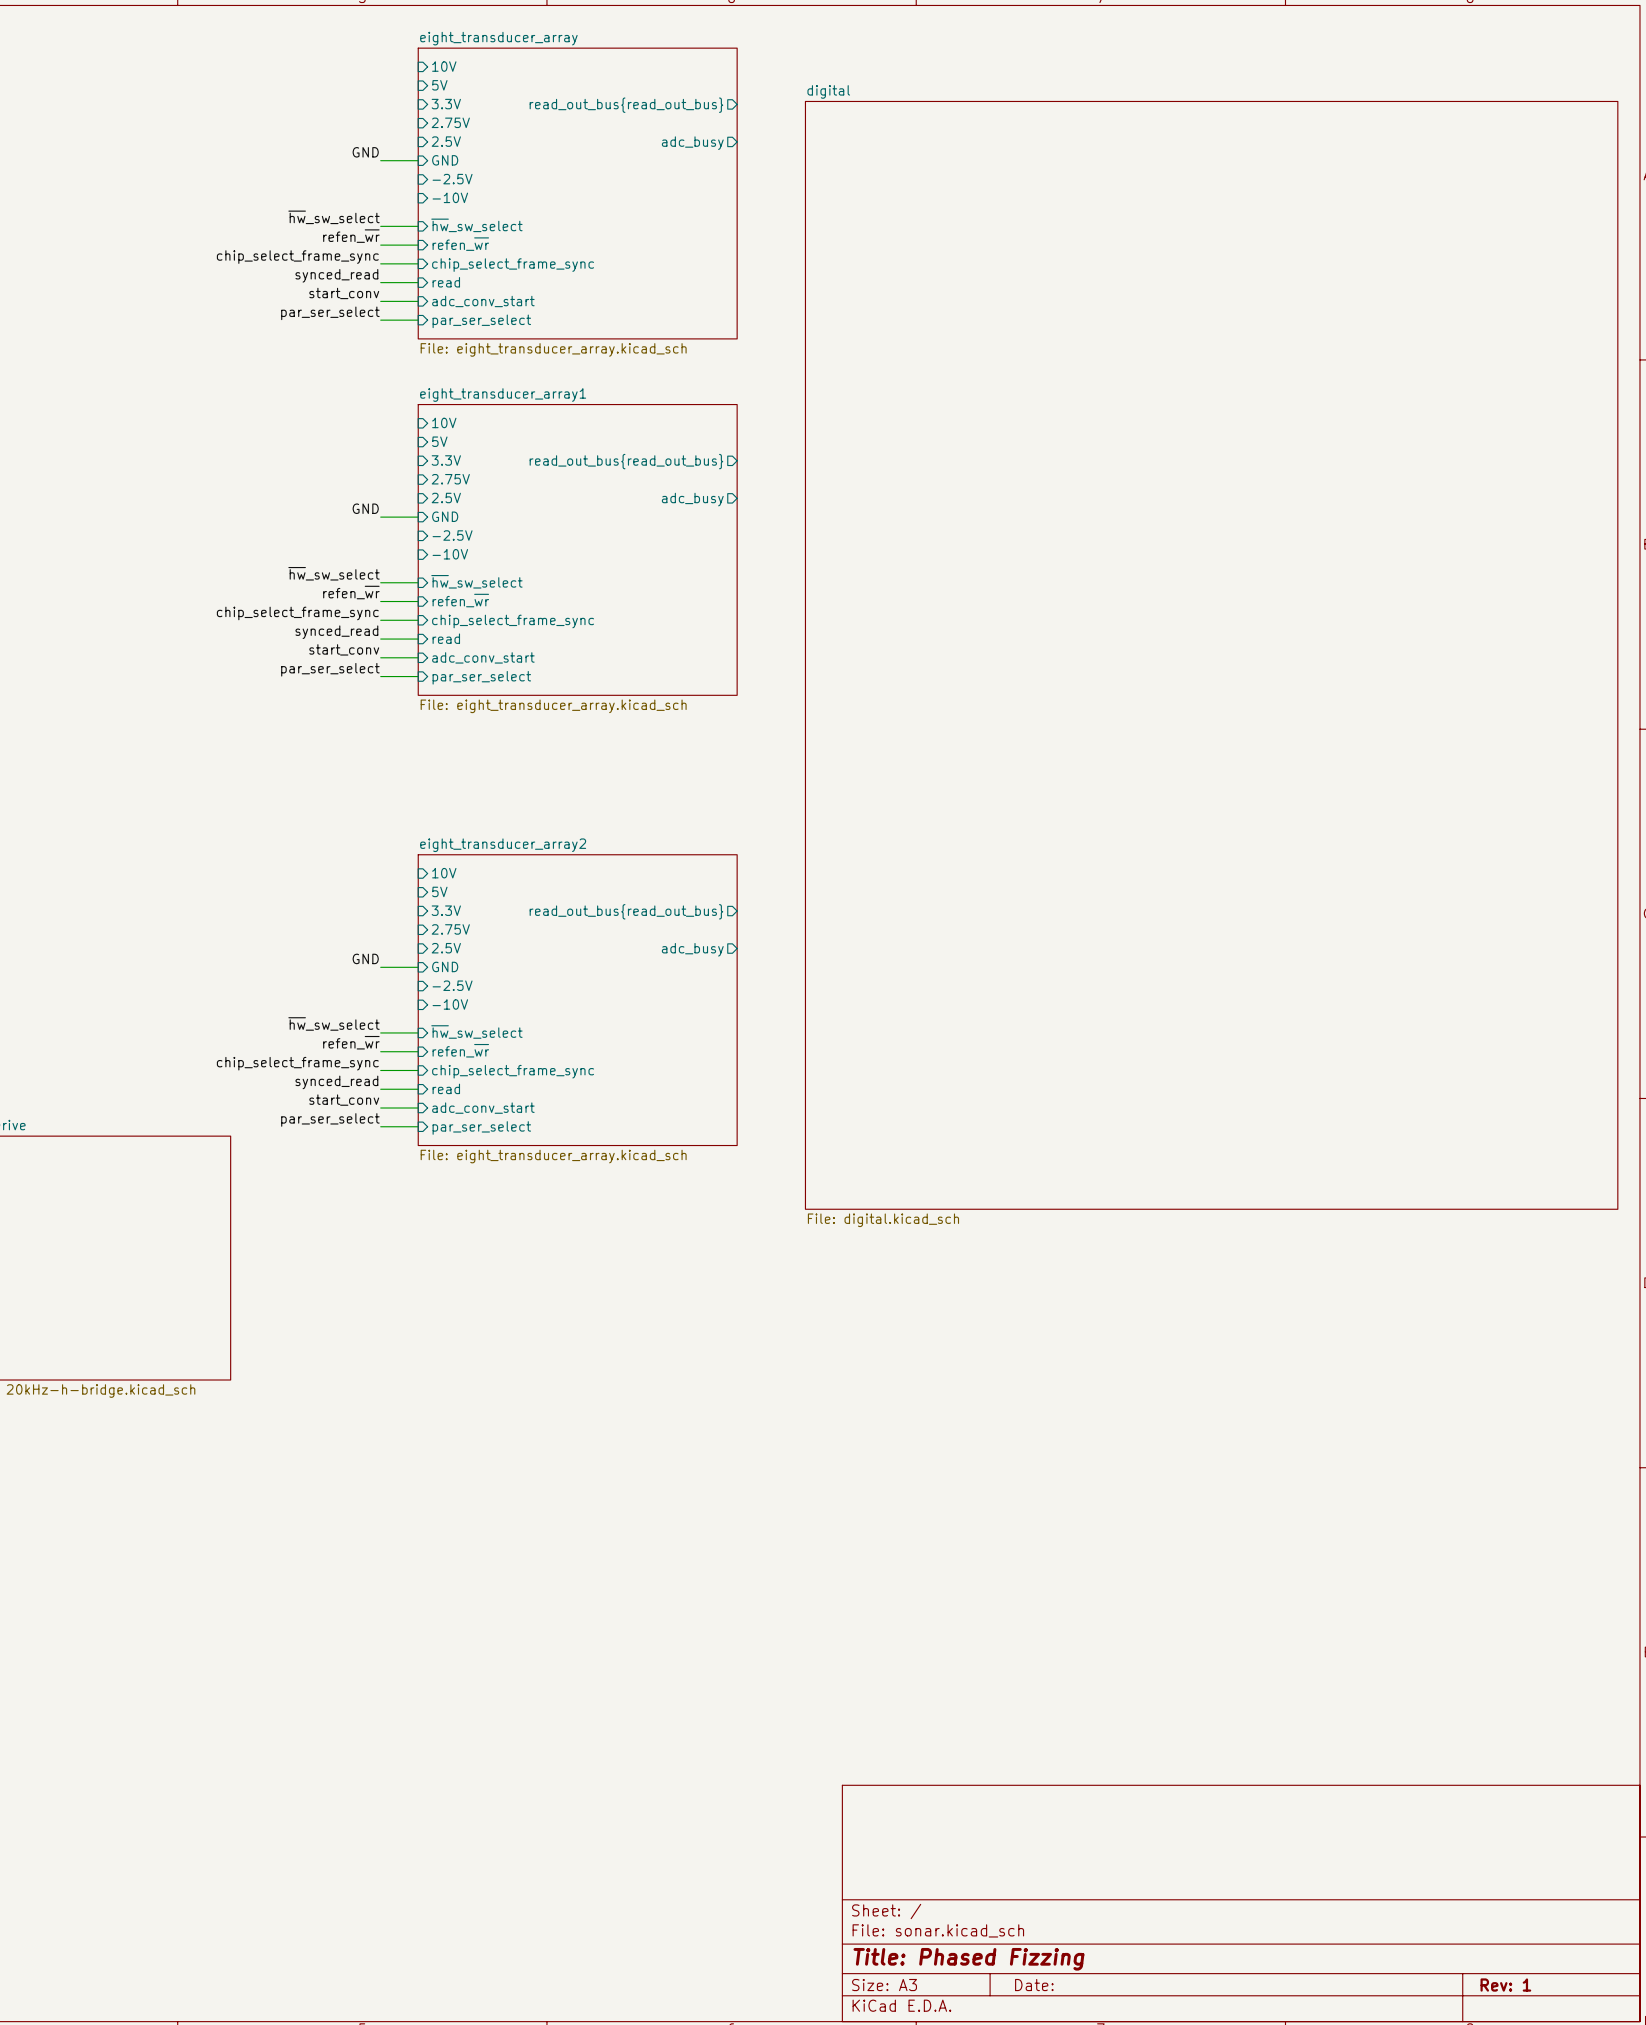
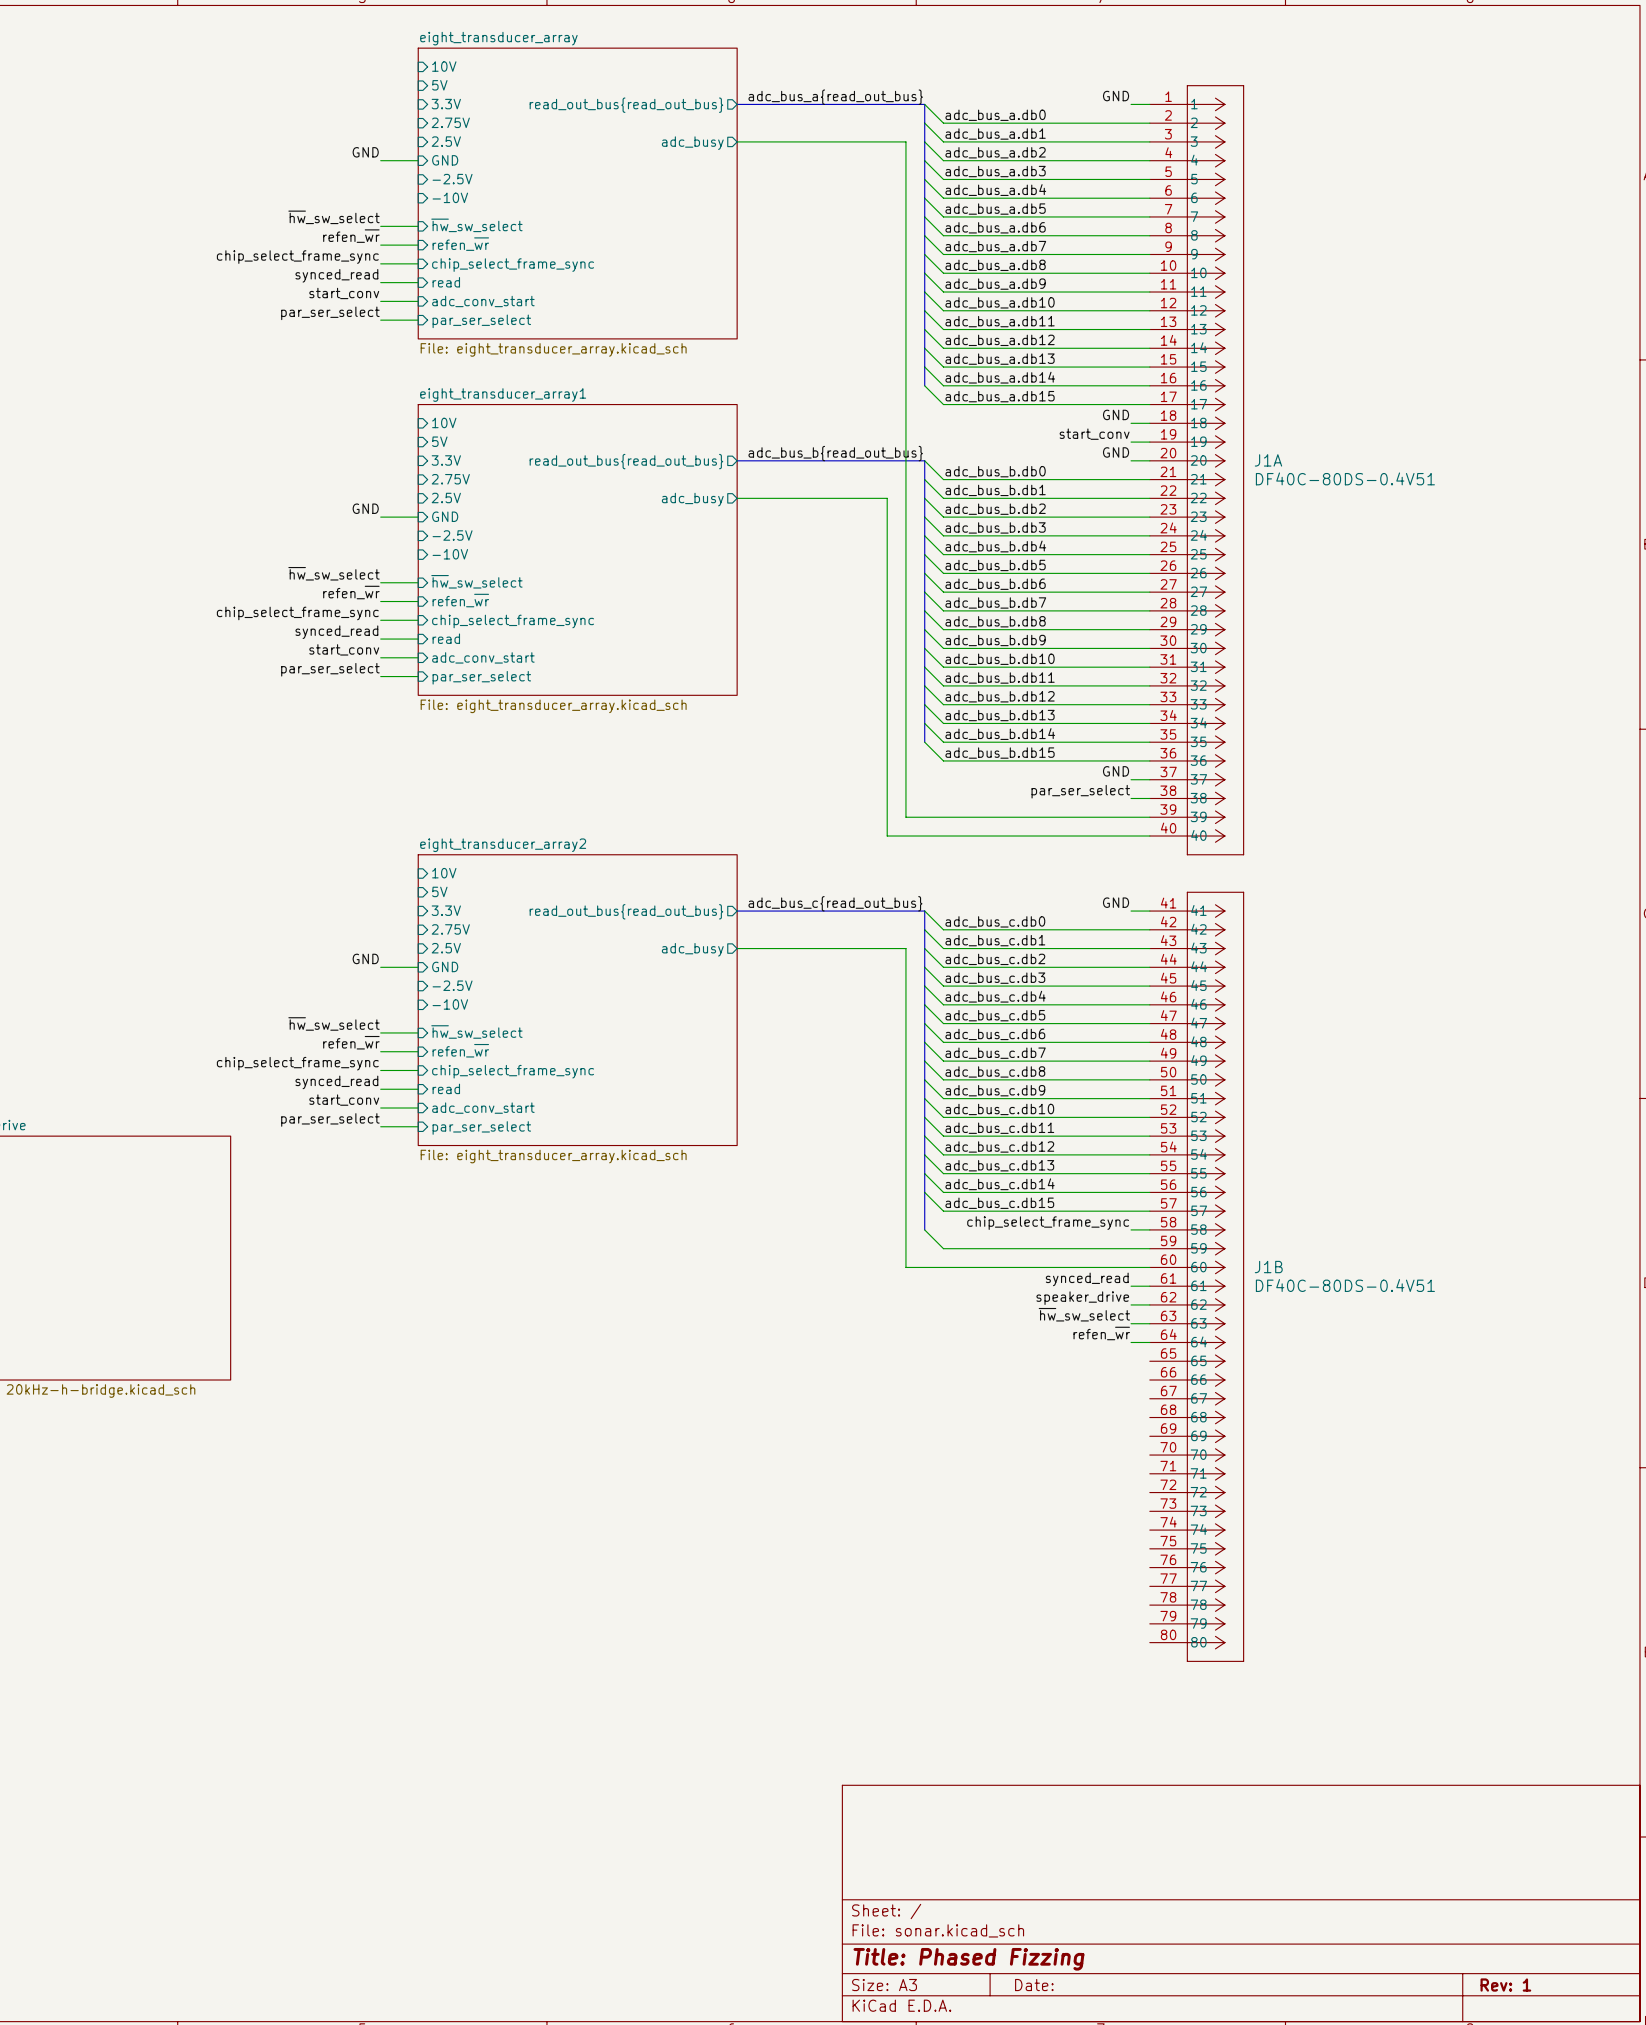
label: none -> GND (1116, 96)
label: none -> adc_bus_a{read_out_bus} (835, 97)
bus: none -> (737, 104) (924, 104) (924, 385)
wire: none -> (924, 104) (943, 123) (1149, 123)
wire: none -> (1131, 104) (1149, 104)
label: none -> adc_bus_a.db0 (995, 115)
wire: none -> (924, 123) (943, 141) (1149, 141)
label: none -> adc_bus_a.db1 (995, 134)
wire: none -> (737, 141) (905, 141) (905, 817) (1149, 817)
wire: none -> (924, 141) (943, 160) (1149, 160)
label: none -> adc_bus_a.db2 (995, 152)
wire: none -> (924, 160) (943, 179) (1149, 179)
label: none -> adc_bus_a.db3 (995, 171)
wire: none -> (924, 179) (943, 198) (1149, 198)
label: none -> adc_bus_a.db4 (995, 190)
wire: none -> (924, 198) (943, 216) (1149, 216)
label: none -> adc_bus_a.db5 (995, 209)
wire: none -> (924, 216) (943, 235) (1149, 235)
label: none -> adc_bus_a.db6 (995, 227)
wire: none -> (924, 235) (943, 254) (1149, 254)
label: none -> adc_bus_a.db7 (995, 246)
wire: none -> (924, 254) (943, 273) (1149, 273)
label: none -> adc_bus_a.db8 (995, 265)
wire: none -> (924, 273) (943, 292) (1149, 292)
label: none -> adc_bus_a.db9 (995, 284)
wire: none -> (924, 292) (943, 310) (1149, 310)
label: none -> adc_bus_a.db10 (1000, 302)
wire: none -> (924, 310) (943, 329) (1149, 329)
label: none -> adc_bus_a.db11 (1000, 321)
wire: none -> (924, 329) (943, 348) (1149, 348)
label: none -> adc_bus_a.db12 (1000, 340)
wire: none -> (924, 348) (943, 367) (1149, 367)
label: none -> adc_bus_a.db13 (1000, 359)
wire: none -> (924, 367) (943, 385) (1149, 385)
label: none -> adc_bus_a.db14 (1000, 377)
wire: none -> (924, 385) (943, 404) (1149, 404)
label: none -> adc_bus_a.db15 (1000, 396)
label: none -> GND (1116, 414)
wire: none -> (1131, 423) (1149, 423)
label: none -> start_conv (1094, 434)
wire: none -> (1131, 442) (1149, 442)
label: none -> GND (1116, 452)
label: none -> adc_bus_b{read_out_bus} (835, 453)
bus: none -> (737, 460) (924, 460) (924, 742)
wire: none -> (924, 460) (943, 479) (1149, 479)
wire: none -> (1131, 460) (1149, 460)
J1A: none -> DF40C-80DS-0.4V51 (1196, 470)
label: none -> adc_bus_b.db0 (995, 471)
wire: none -> (924, 479) (943, 498) (1149, 498)
label: none -> adc_bus_b.db1 (995, 490)
wire: none -> (737, 498) (887, 498) (887, 836) (1149, 836)
wire: none -> (924, 498) (943, 517) (1149, 517)
label: none -> adc_bus_b.db2 (995, 509)
wire: none -> (924, 517) (943, 535) (1149, 535)
label: none -> adc_bus_b.db3 (995, 527)
wire: none -> (924, 535) (943, 554) (1149, 554)
label: none -> adc_bus_b.db4 (995, 546)
wire: none -> (924, 554) (943, 573) (1149, 573)
label: none -> adc_bus_b.db5 (995, 565)
wire: none -> (924, 573) (943, 592) (1149, 592)
label: none -> adc_bus_b.db6 (995, 584)
wire: none -> (924, 592) (943, 610) (1149, 610)
label: none -> adc_bus_b.db7 (995, 602)
wire: none -> (924, 610) (943, 629) (1149, 629)
label: none -> adc_bus_b.db8 (995, 621)
wire: none -> (924, 629) (943, 648) (1149, 648)
label: none -> adc_bus_b.db9 (995, 640)
wire: none -> (924, 648) (943, 667) (1149, 667)
sheet digital: File: digital.kicad_sch (1211, 655) -> none
label: none -> adc_bus_b.db10 (1000, 659)
wire: none -> (924, 667) (943, 685) (1149, 685)
label: none -> adc_bus_b.db11 (1000, 678)
wire: none -> (924, 685) (943, 704) (1149, 704)
label: none -> adc_bus_b.db12 (1000, 696)
wire: none -> (924, 704) (943, 723) (1149, 723)
label: none -> adc_bus_b.db13 (1000, 715)
wire: none -> (924, 723) (943, 742) (1149, 742)
label: none -> adc_bus_b.db14 (1000, 734)
wire: none -> (924, 742) (943, 760) (1149, 760)
label: none -> adc_bus_b.db15 (1000, 753)
label: none -> GND (1116, 771)
wire: none -> (1131, 779) (1149, 779)
label: none -> par_ser_select (1080, 791)
wire: none -> (1131, 798) (1149, 798)
label: none -> GND (1116, 902)
label: none -> adc_bus_c{read_out_bus} (835, 903)
bus: none -> (737, 911) (924, 911) (924, 1229)
wire: none -> (924, 911) (943, 929) (1149, 929)
wire: none -> (1131, 911) (1149, 911)
label: none -> adc_bus_c.db0 (995, 921)
wire: none -> (924, 929) (943, 948) (1149, 948)
label: none -> adc_bus_c.db1 (995, 940)
wire: none -> (737, 948) (905, 948) (905, 1267) (1149, 1267)
wire: none -> (924, 948) (943, 967) (1149, 967)
label: none -> adc_bus_c.db2 (995, 959)
wire: none -> (924, 967) (943, 986) (1149, 986)
label: none -> adc_bus_c.db3 (995, 978)
wire: none -> (924, 986) (943, 1004) (1149, 1004)
label: none -> adc_bus_c.db4 (995, 996)
wire: none -> (924, 1004) (943, 1023) (1149, 1023)
label: none -> adc_bus_c.db5 (995, 1015)
wire: none -> (924, 1023) (943, 1042) (1149, 1042)
label: none -> adc_bus_c.db6 (995, 1034)
wire: none -> (924, 1042) (943, 1061) (1149, 1061)
label: none -> adc_bus_c.db7 (995, 1053)
wire: none -> (924, 1061) (943, 1079) (1149, 1079)
label: none -> adc_bus_c.db8 (995, 1071)
wire: none -> (924, 1079) (943, 1098) (1149, 1098)
label: none -> adc_bus_c.db9 (995, 1090)
wire: none -> (924, 1098) (943, 1117) (1149, 1117)
label: none -> adc_bus_c.db10 (999, 1109)
wire: none -> (924, 1117) (943, 1136) (1149, 1136)
label: none -> adc_bus_c.db11 (999, 1128)
wire: none -> (924, 1136) (943, 1154) (1149, 1154)
label: none -> adc_bus_c.db12 (999, 1146)
wire: none -> (924, 1154) (943, 1173) (1149, 1173)
label: none -> adc_bus_c.db13 (999, 1165)
wire: none -> (924, 1173) (943, 1192) (1149, 1192)
label: none -> adc_bus_c.db14 (1000, 1184)
wire: none -> (924, 1192) (943, 1211) (1149, 1211)
label: none -> adc_bus_c.db15 (999, 1203)
label: none -> chip_select_frame_sync (1048, 1223)
wire: none -> (924, 1229) (943, 1248) (1149, 1248)
wire: none -> (1131, 1229) (1149, 1229)
J1B: none -> DF40C-80DS-0.4V51 (1196, 1276)
label: none -> synced_read (1087, 1279)
wire: none -> (1131, 1286) (1149, 1286)
label: none -> speaker_drive (1082, 1298)
wire: none -> (1131, 1304) (1149, 1304)
label: none -> ~{hw}_sw_select (1084, 1314)
wire: none -> (1131, 1323) (1149, 1323)
label: none -> refen_~{wr} (1101, 1333)
wire: none -> (1131, 1342) (1149, 1342)

